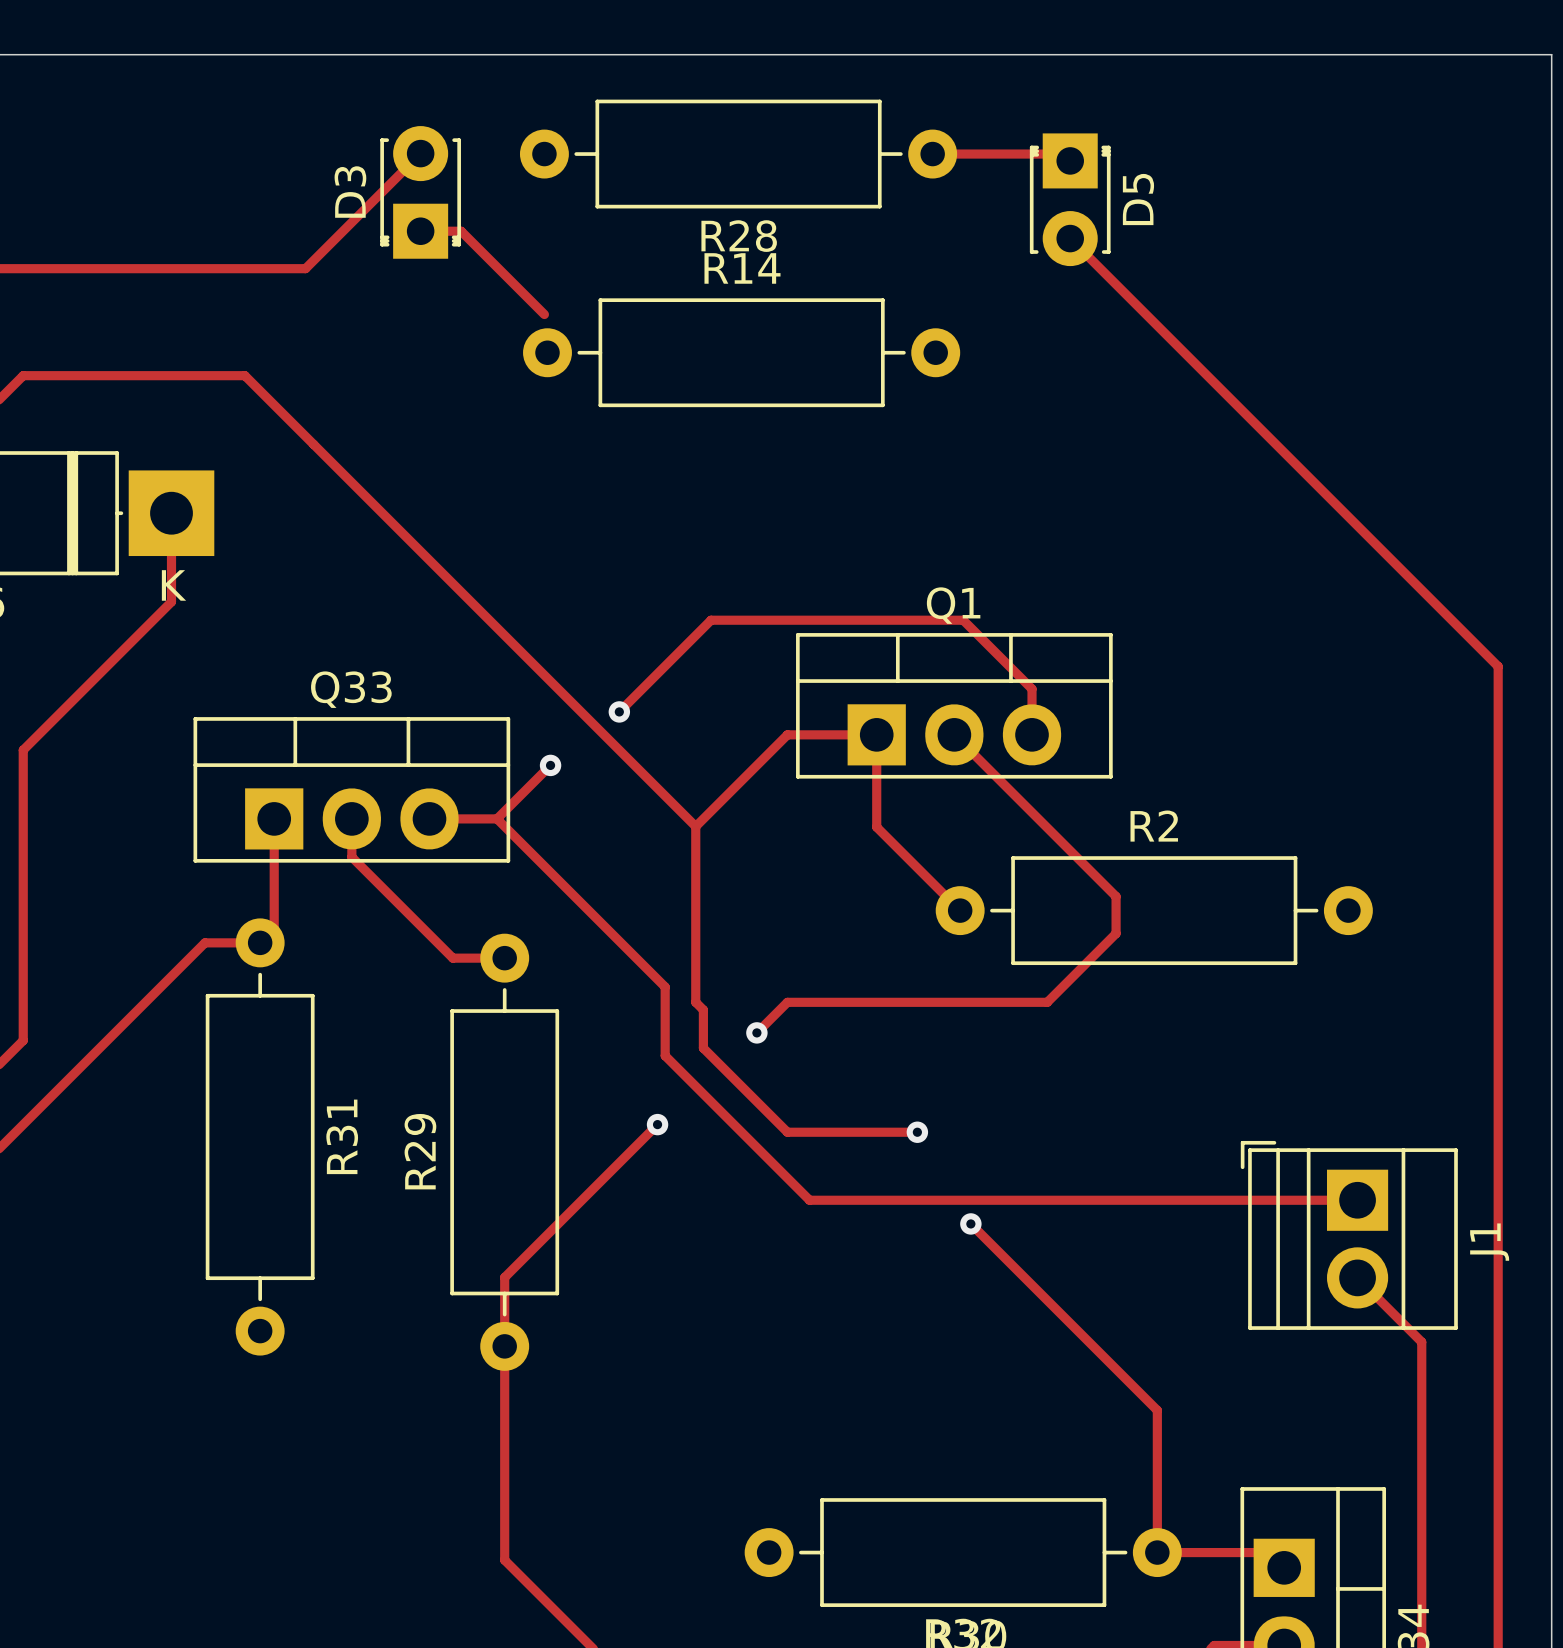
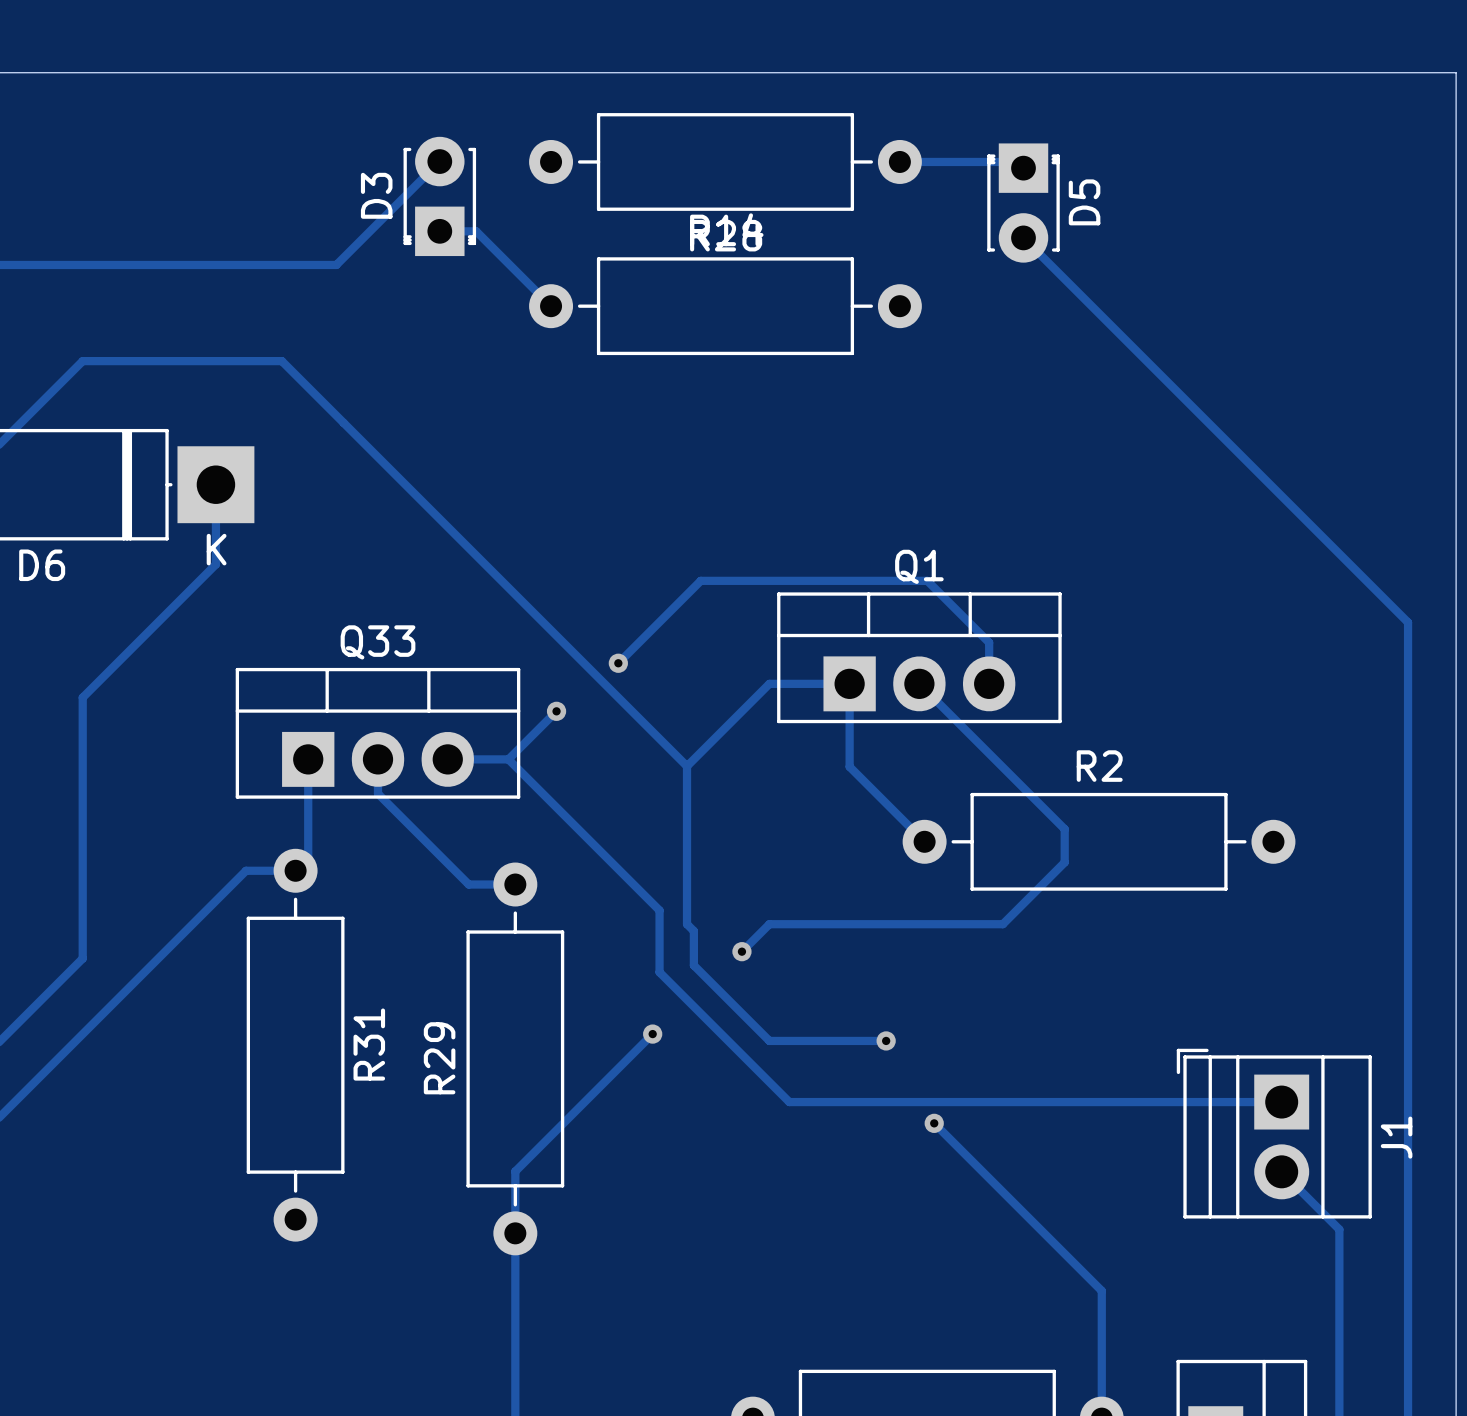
R14 position: (741, 352) -> (725, 306)

